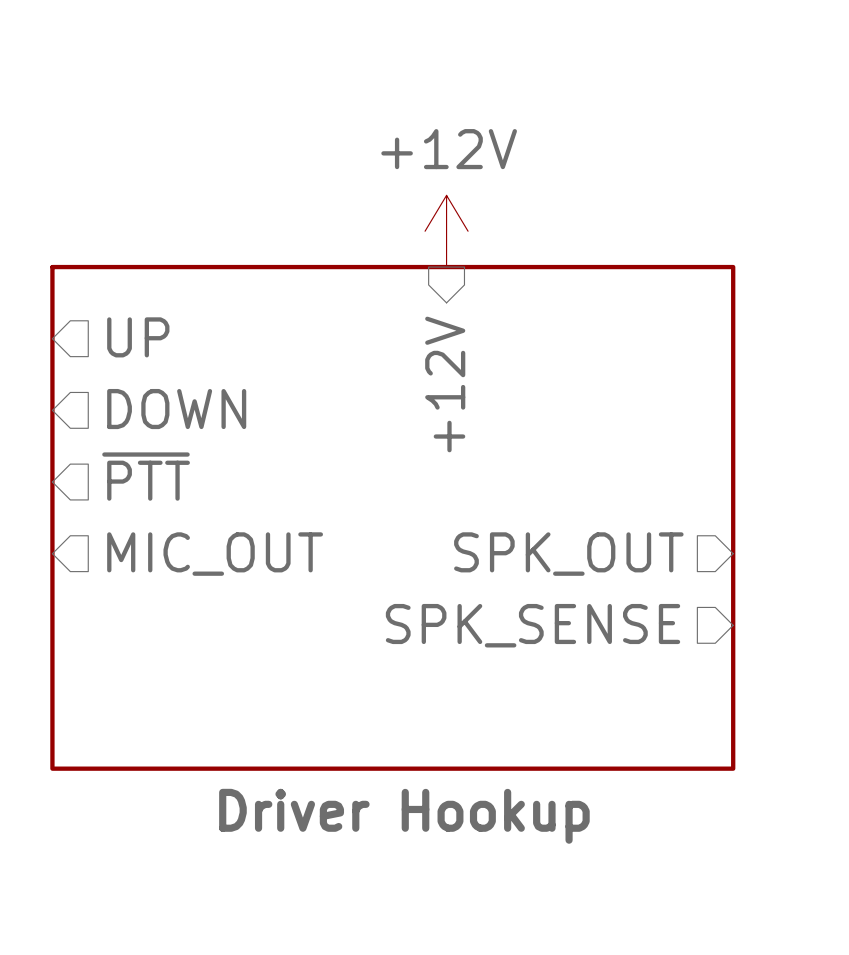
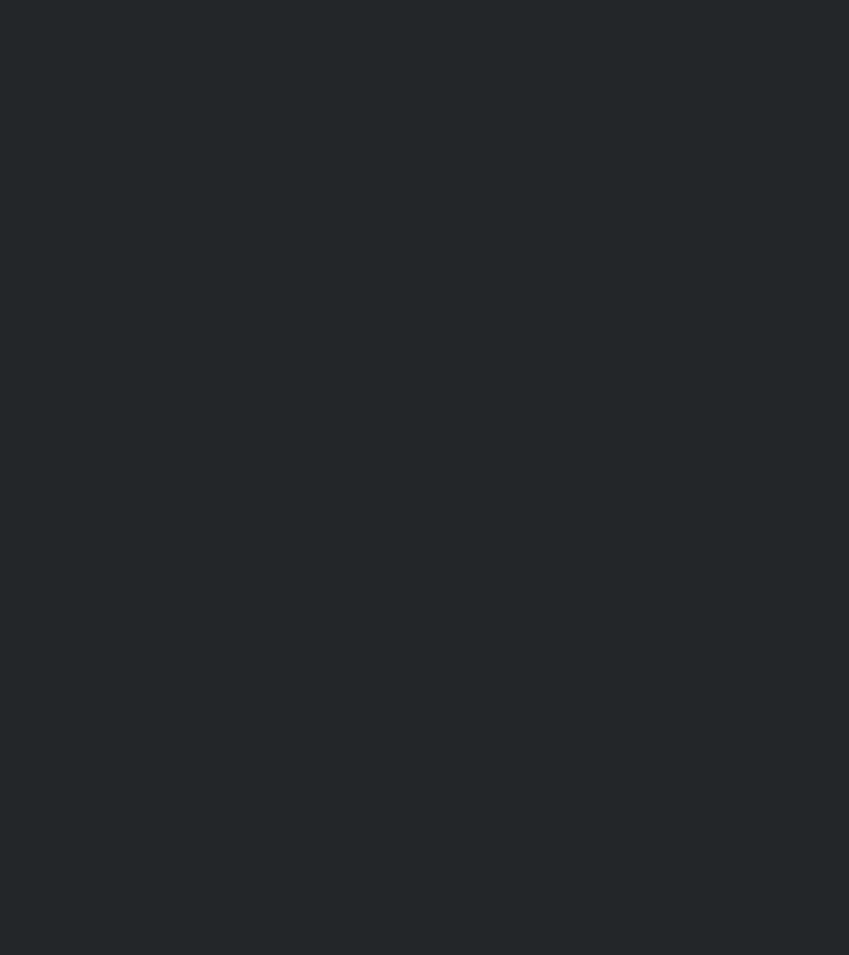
power symbol: +12V (446, 231) -> none
sheet pin: UP (138, 337) -> none
sheet pin: +12V (445, 384) -> none
sheet pin: DOWN (176, 409) -> none
sheet pin: ~{PTT} (146, 476) -> none
sheet Driver Hookup: (392, 517) -> none
sheet pin: MIC_OUT (215, 554) -> none
sheet pin: SPK_OUT (568, 554) -> none
sheet pin: SPK_SENSE (533, 625) -> none

